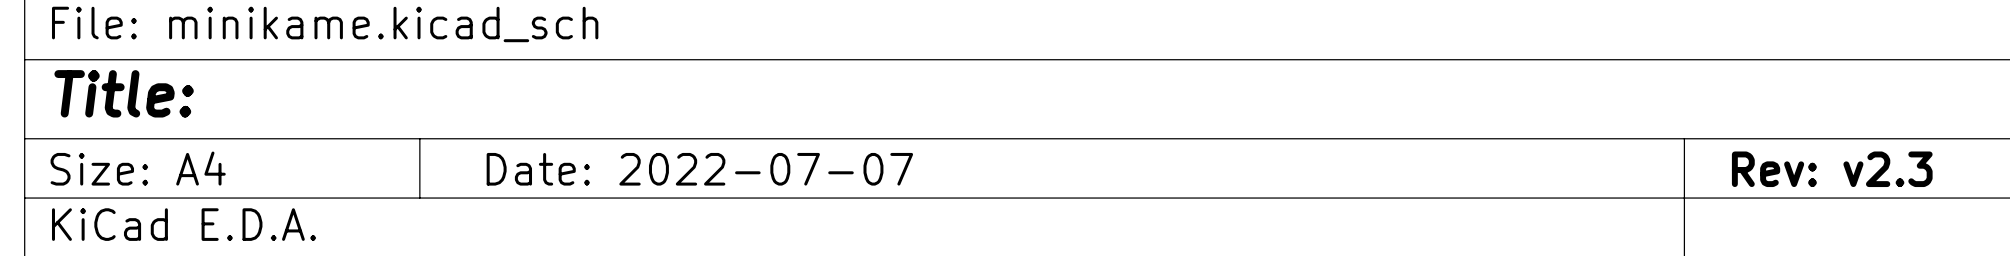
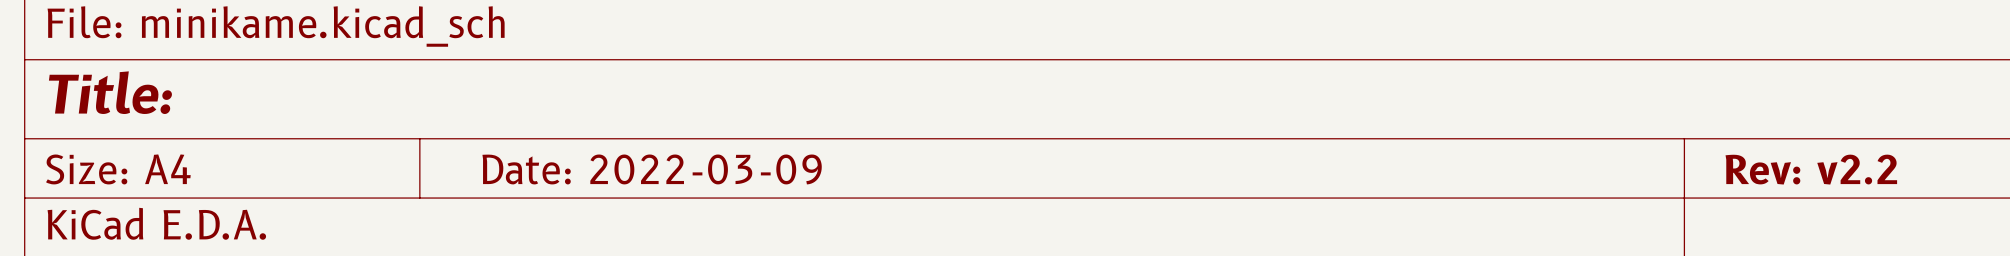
title block: Date: 2022-07-07 (699, 169) -> Date: 2022-03-09 (652, 169)
title block: Rev: v2.3 (1832, 169) -> Rev: v2.2 (1811, 169)

